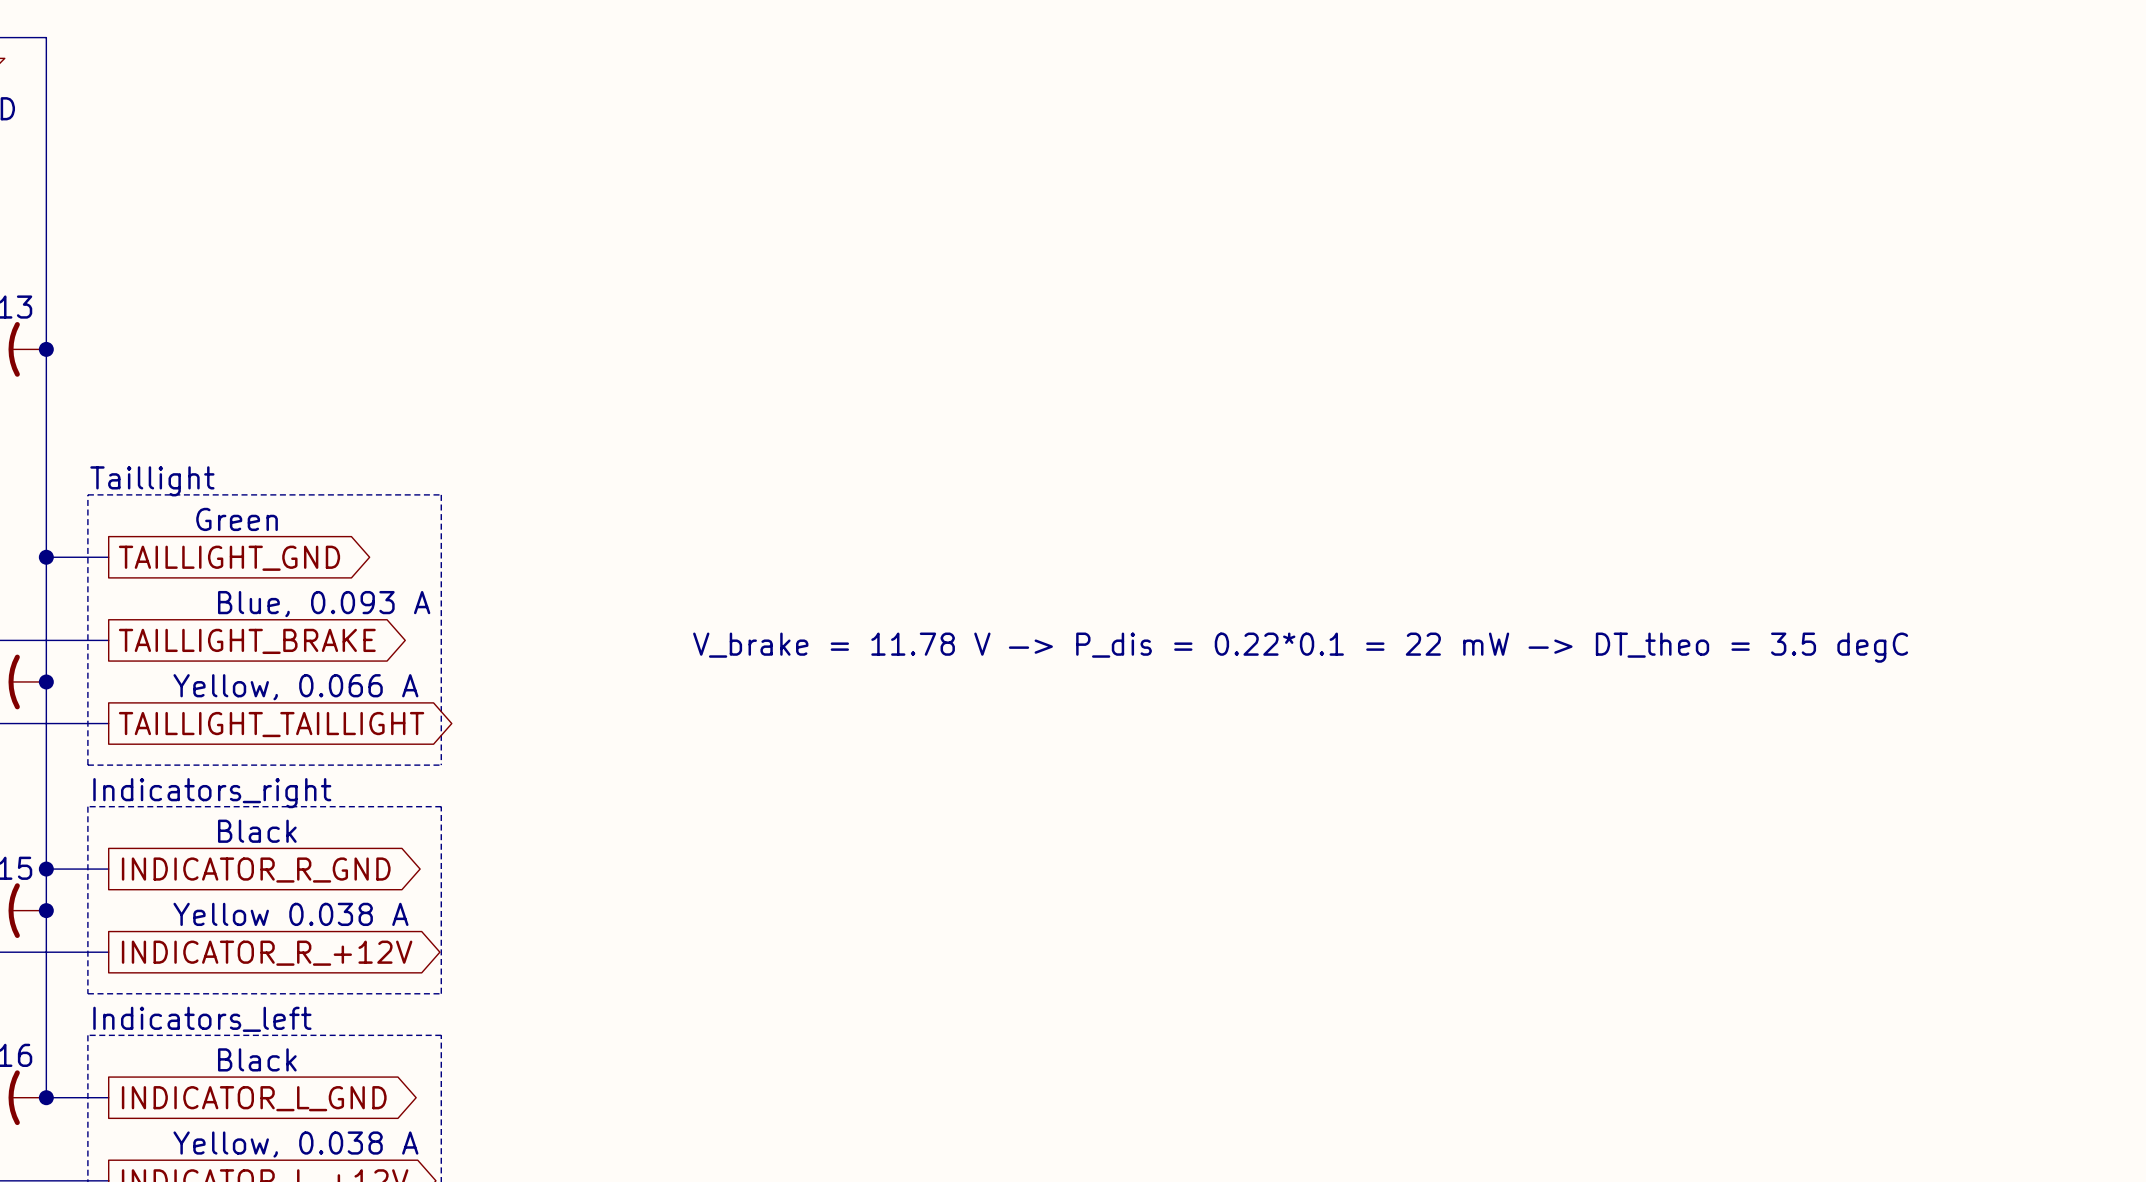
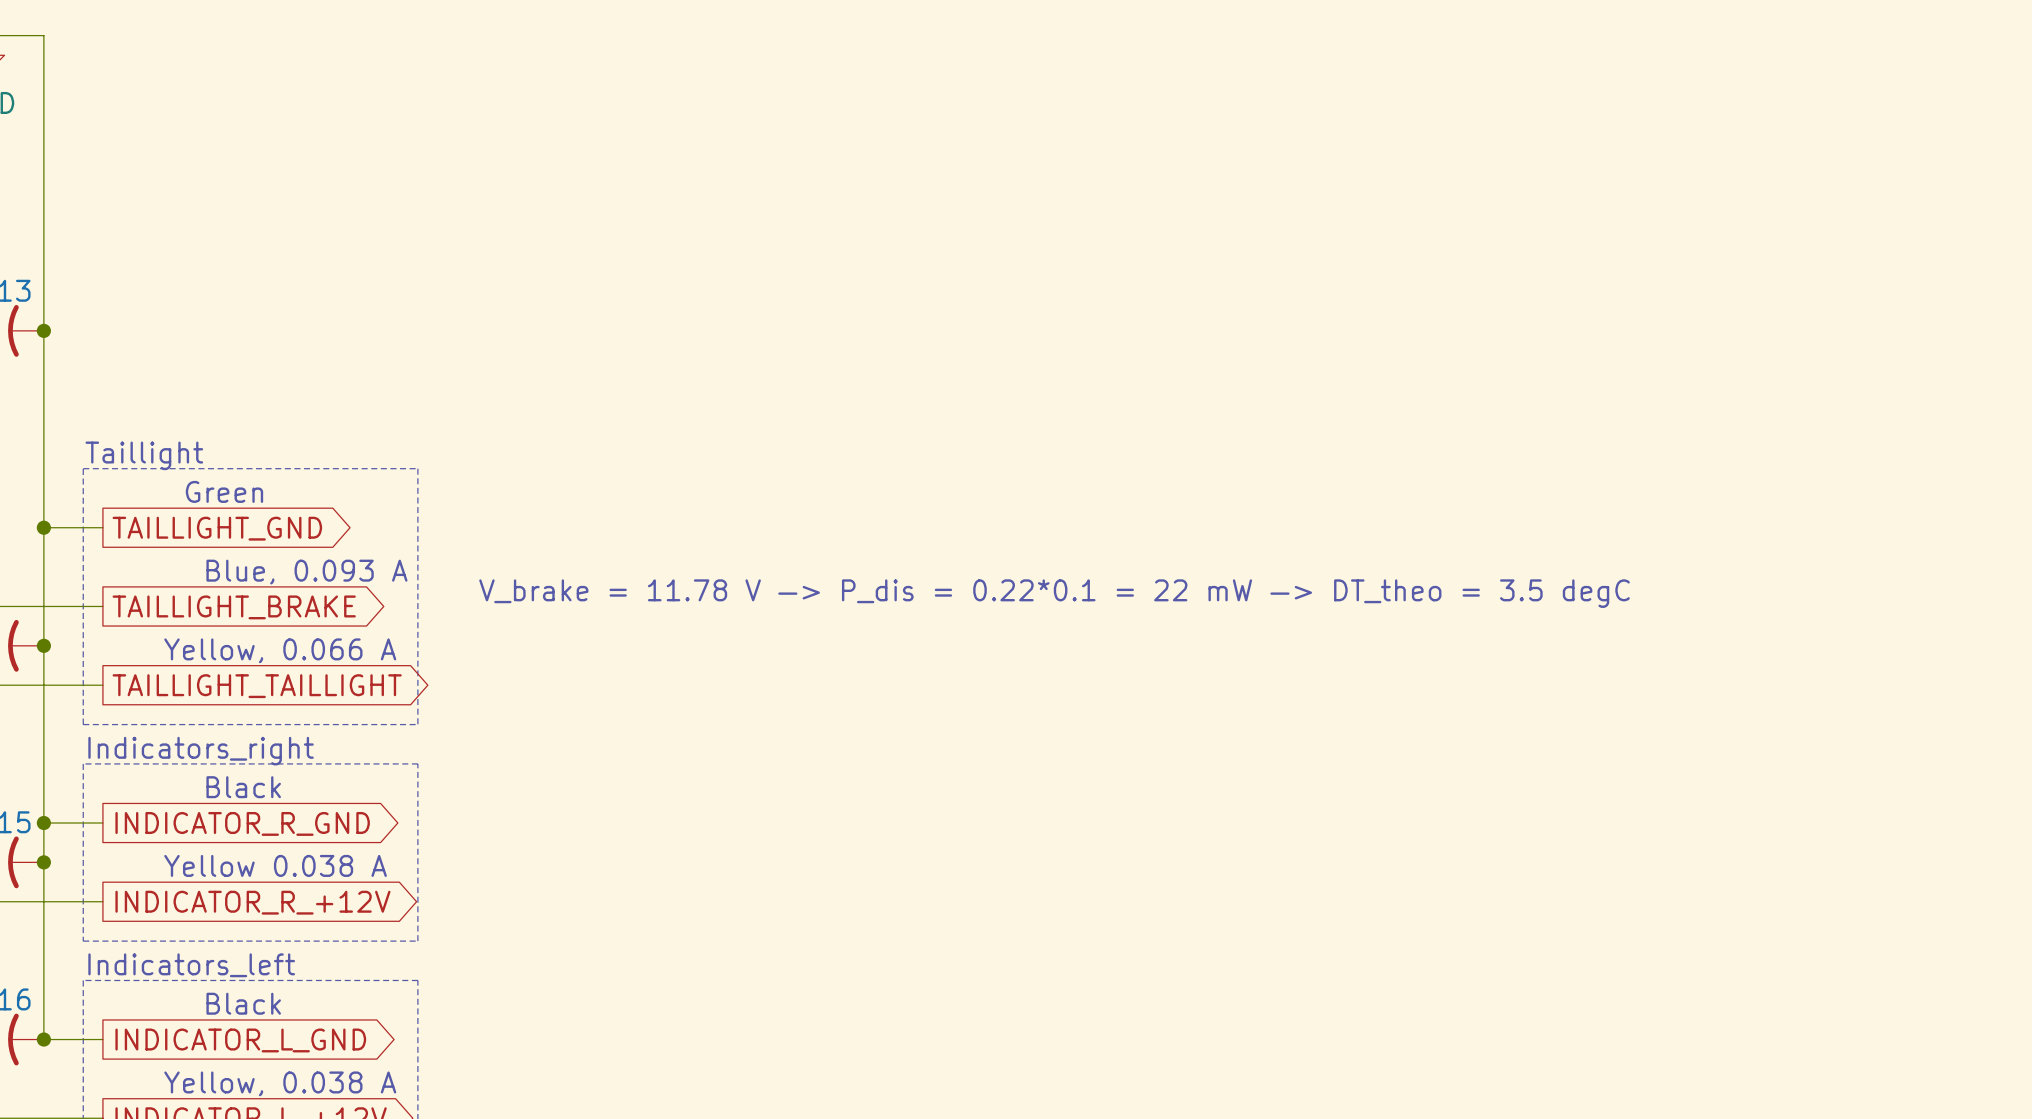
text position: V_brake = 11.78 V —> P_dis = 0.22*0.1 = 22 mW —> DT_theo = 3.5 degC (1300, 647) -> V_brake = 11.78 V —> P_dis = 0.22*0.1 = 22 mW —> DT_theo = 3.5 degC (1054, 593)

